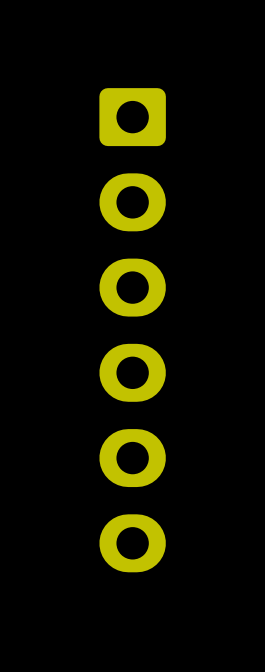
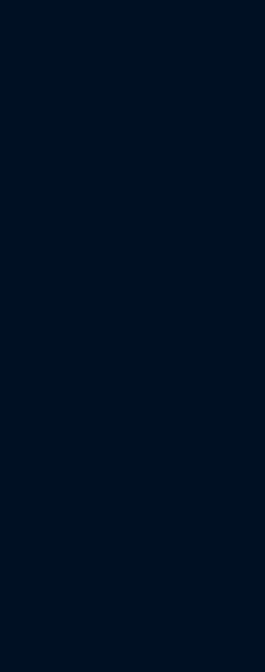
part: (132, 330) -> none

